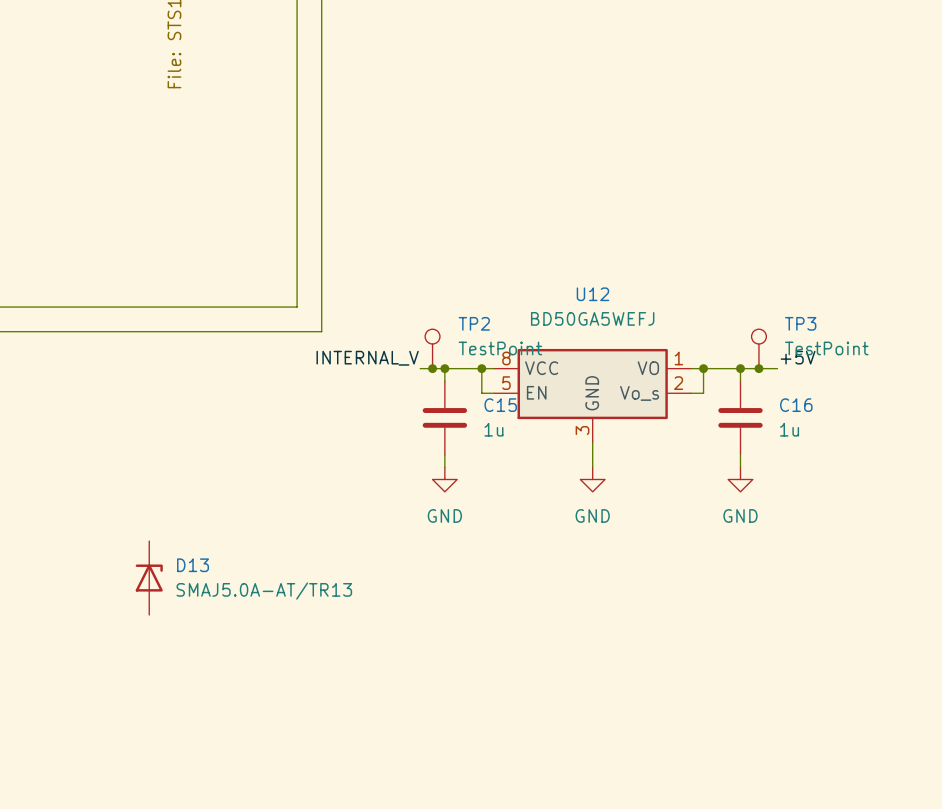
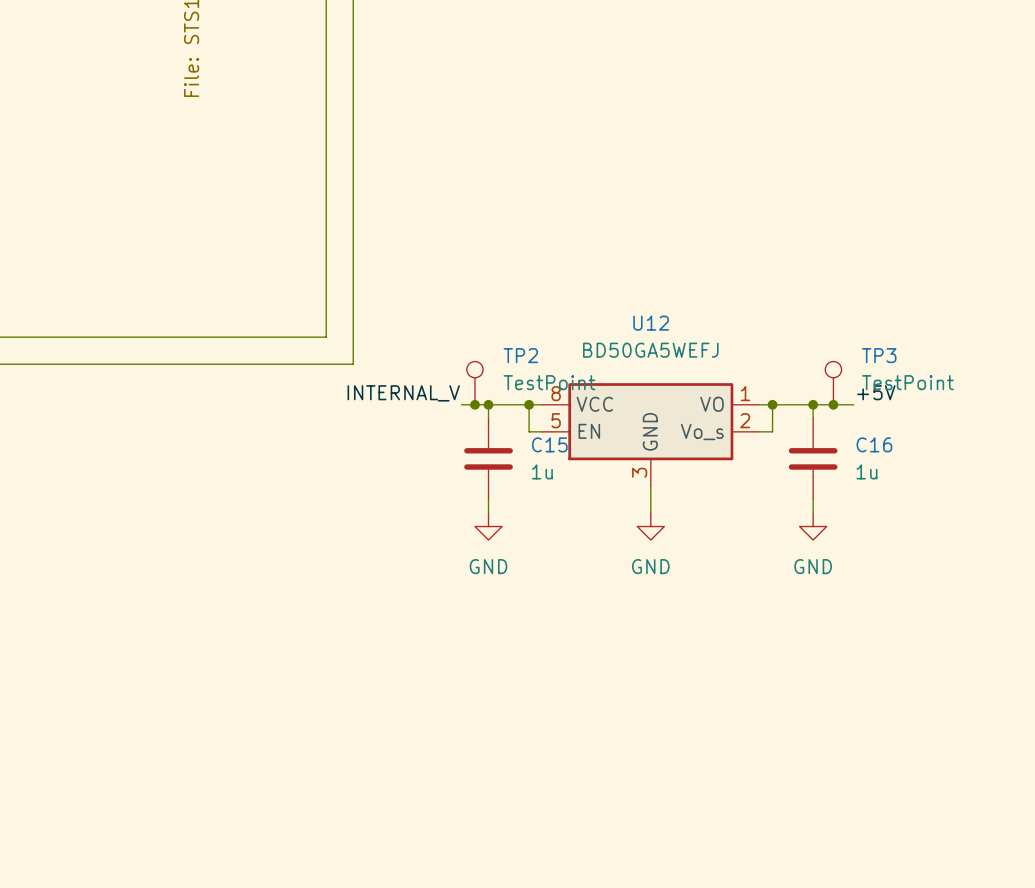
D13: SMAJ5.0A-AT/TR13 (149, 578) -> none

